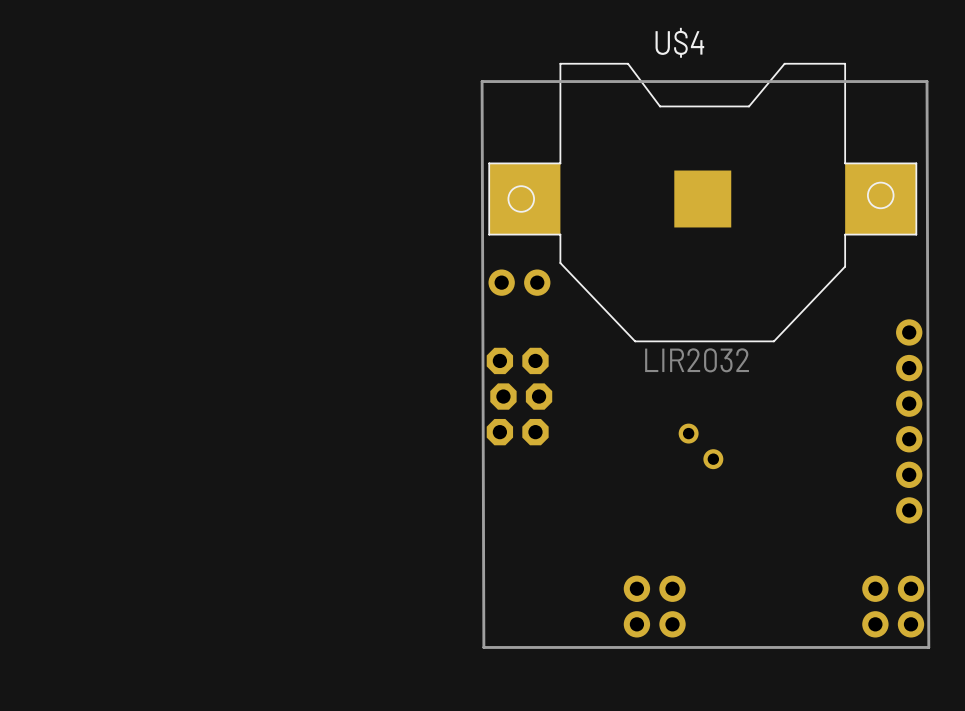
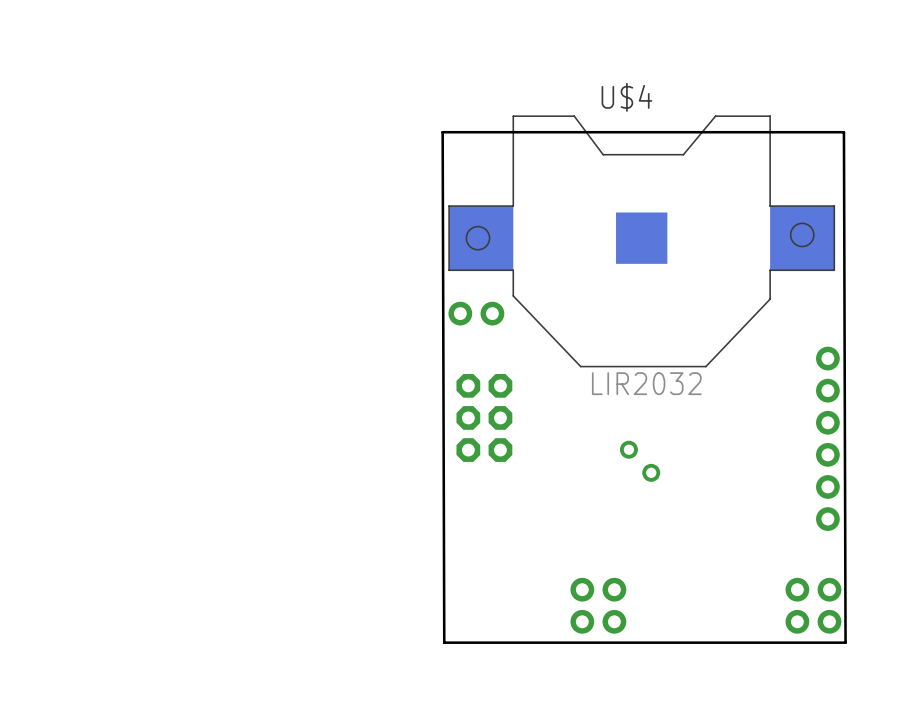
part footprint: [486, 347, 553, 446] -> [456, 373, 513, 462]

